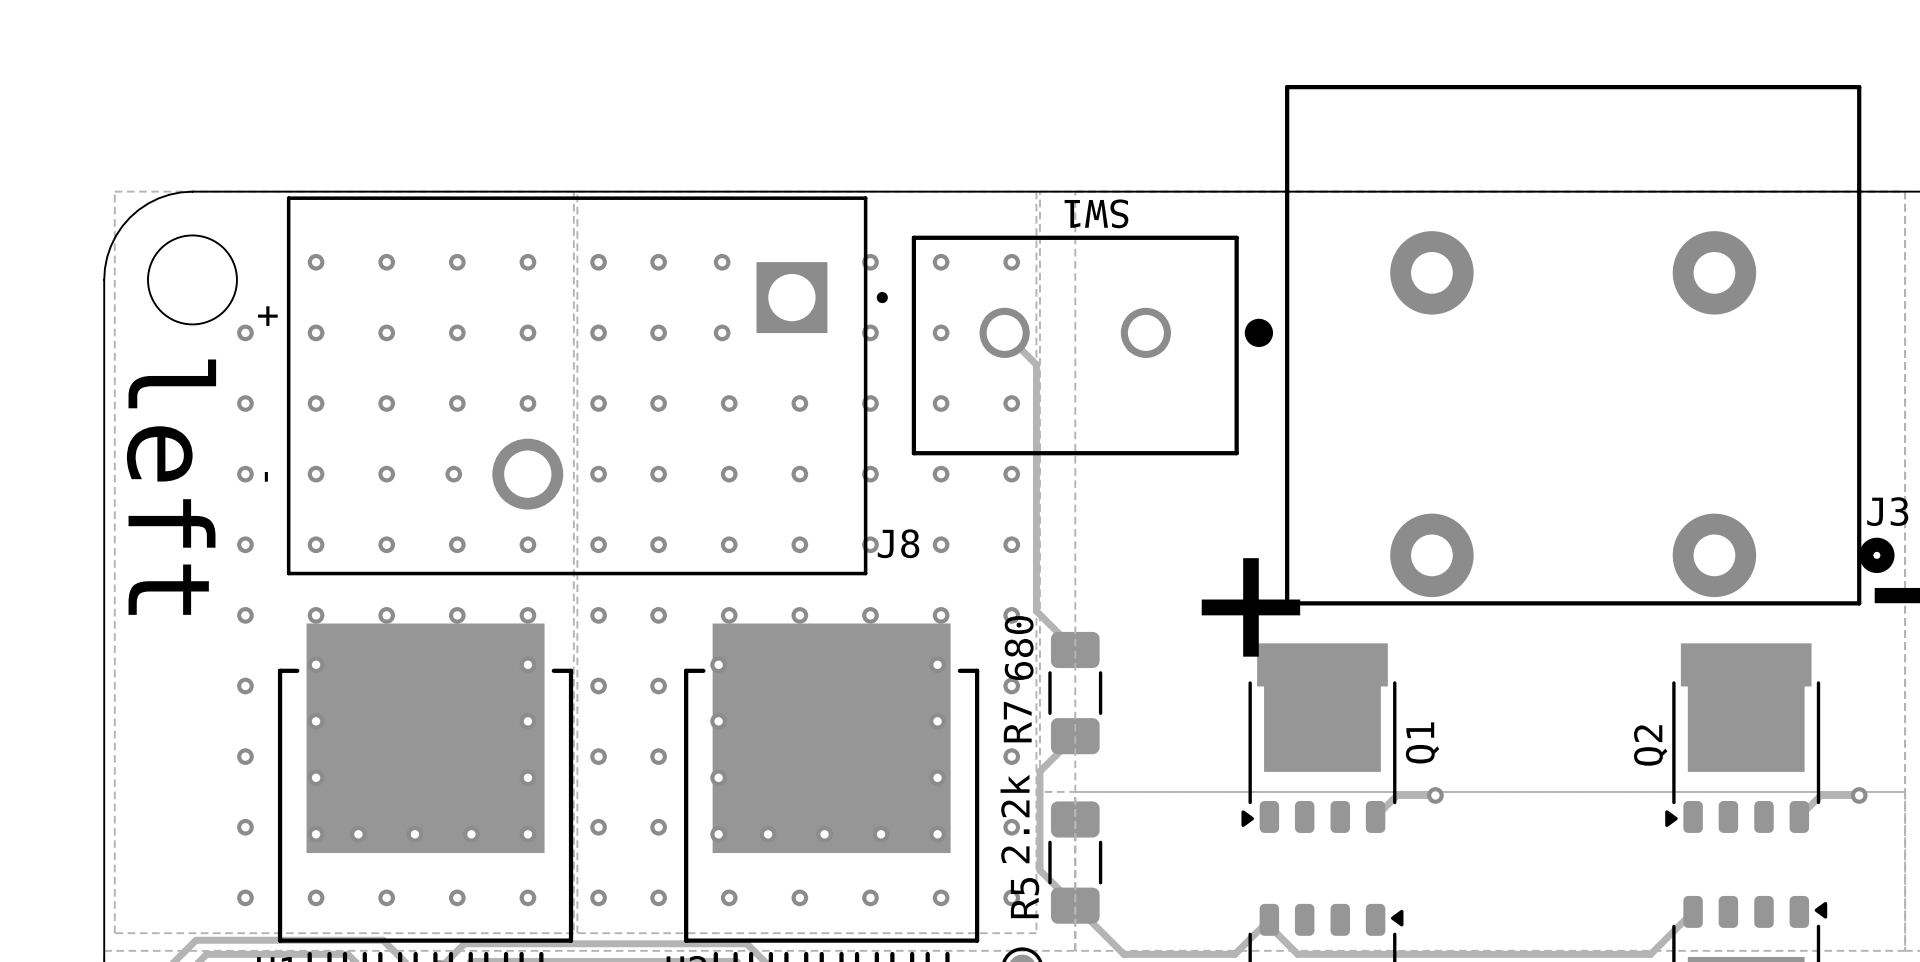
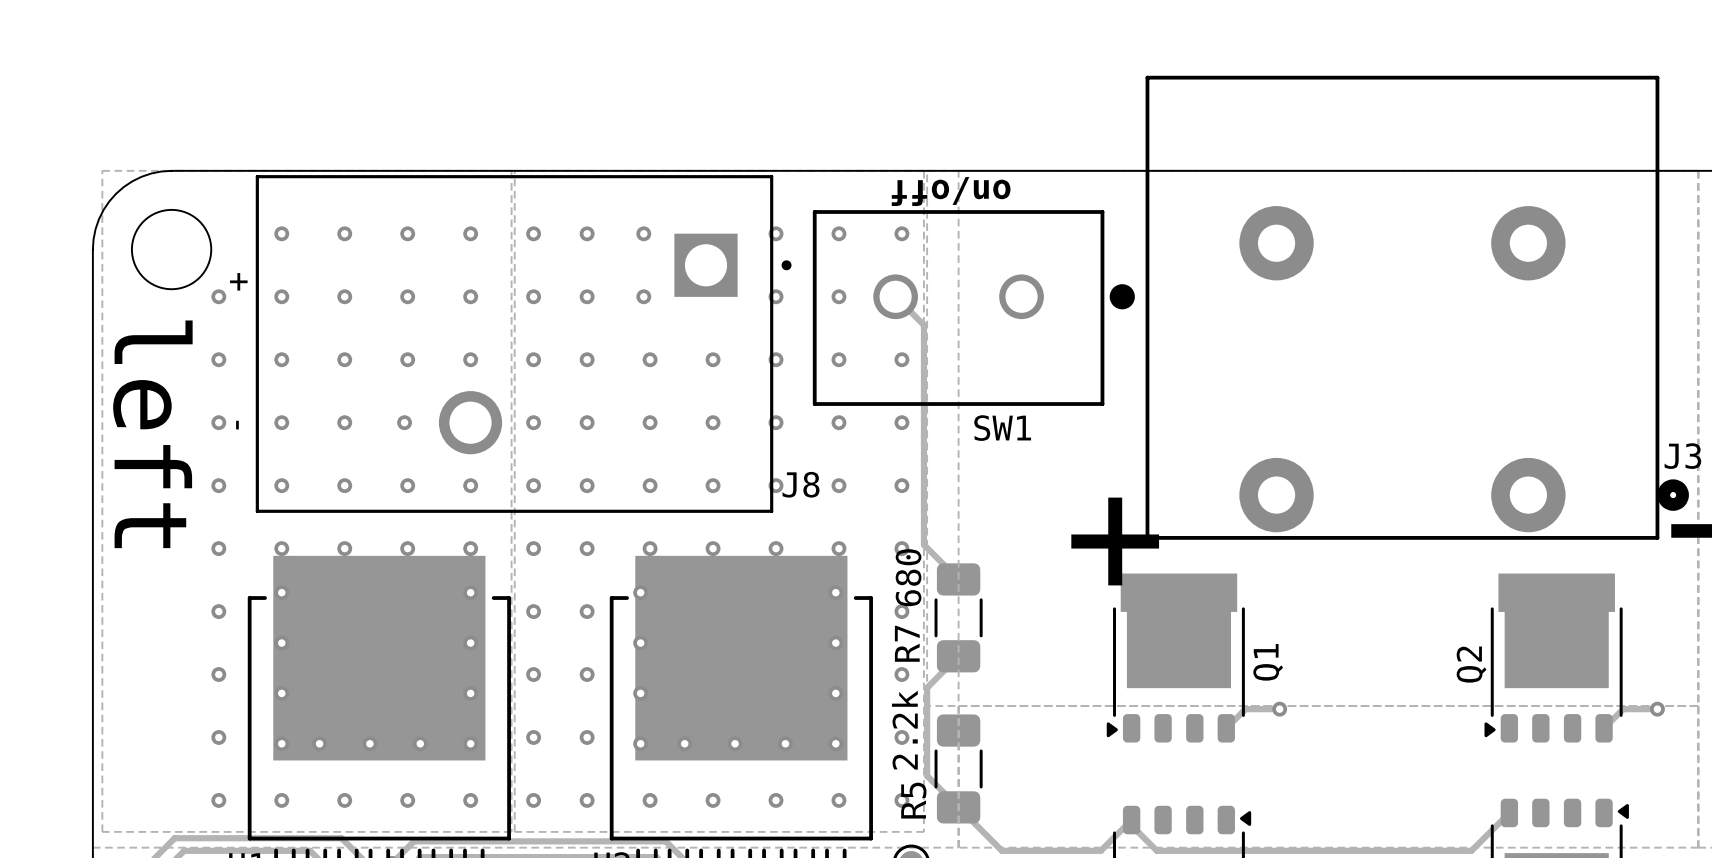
SW1 name rotation: 0° (1096, 213) -> 180° (1002, 428)
SW1 name position: SW1 (1096, 213) -> SW1 (1002, 428)
text: none -> on/off (951, 191)

